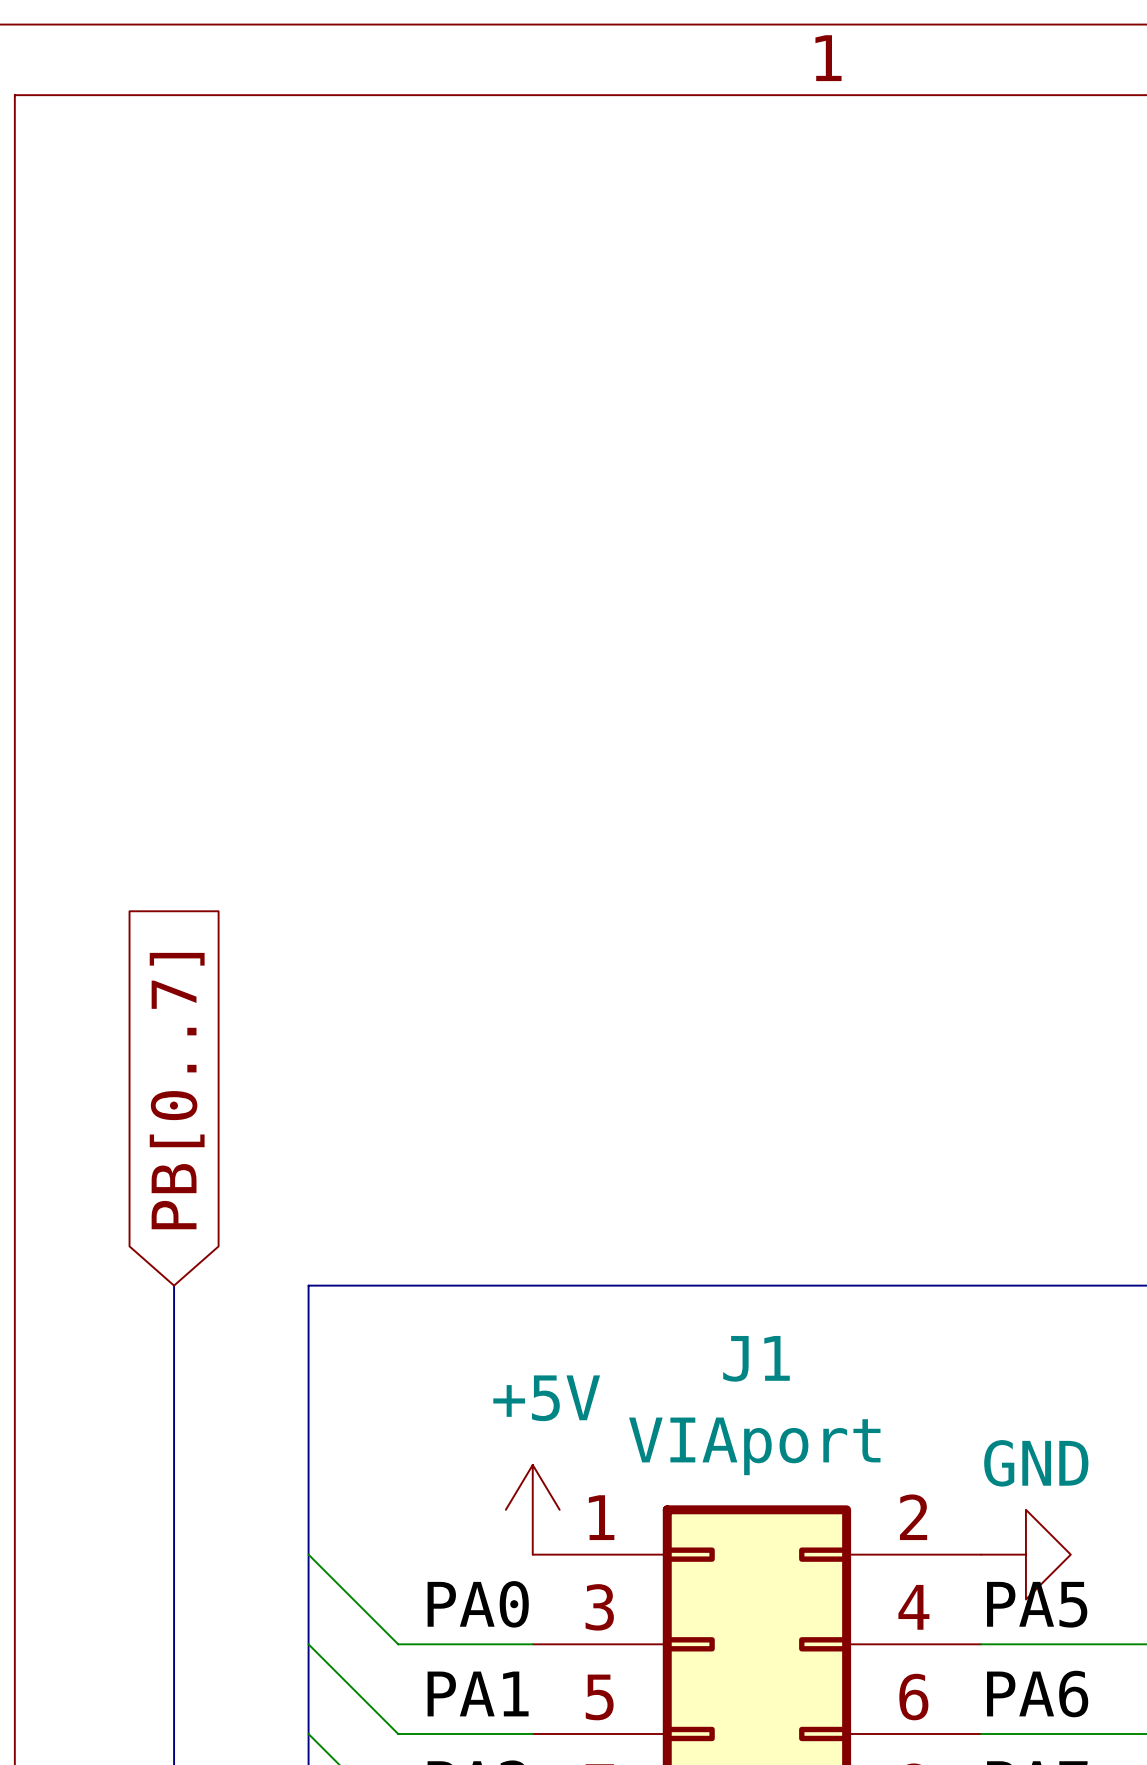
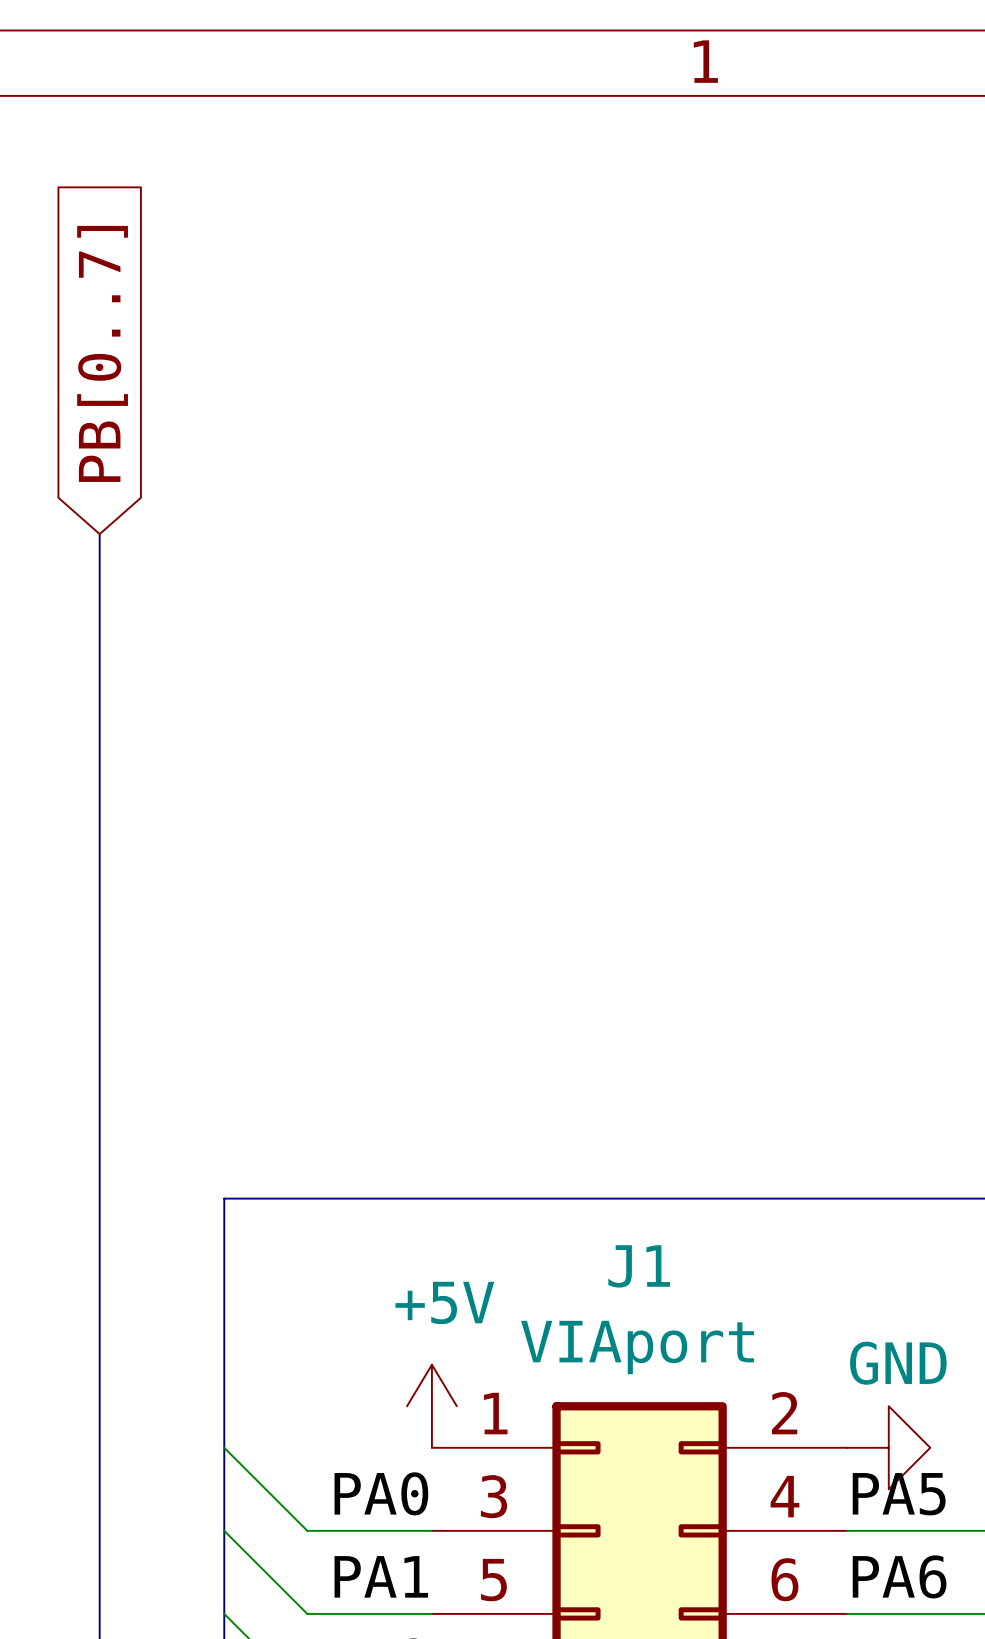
bus: none -> (99, 534) (99, 1198)
global label position: PB[0..7] (177, 1091) -> PB[0..7] (102, 353)

